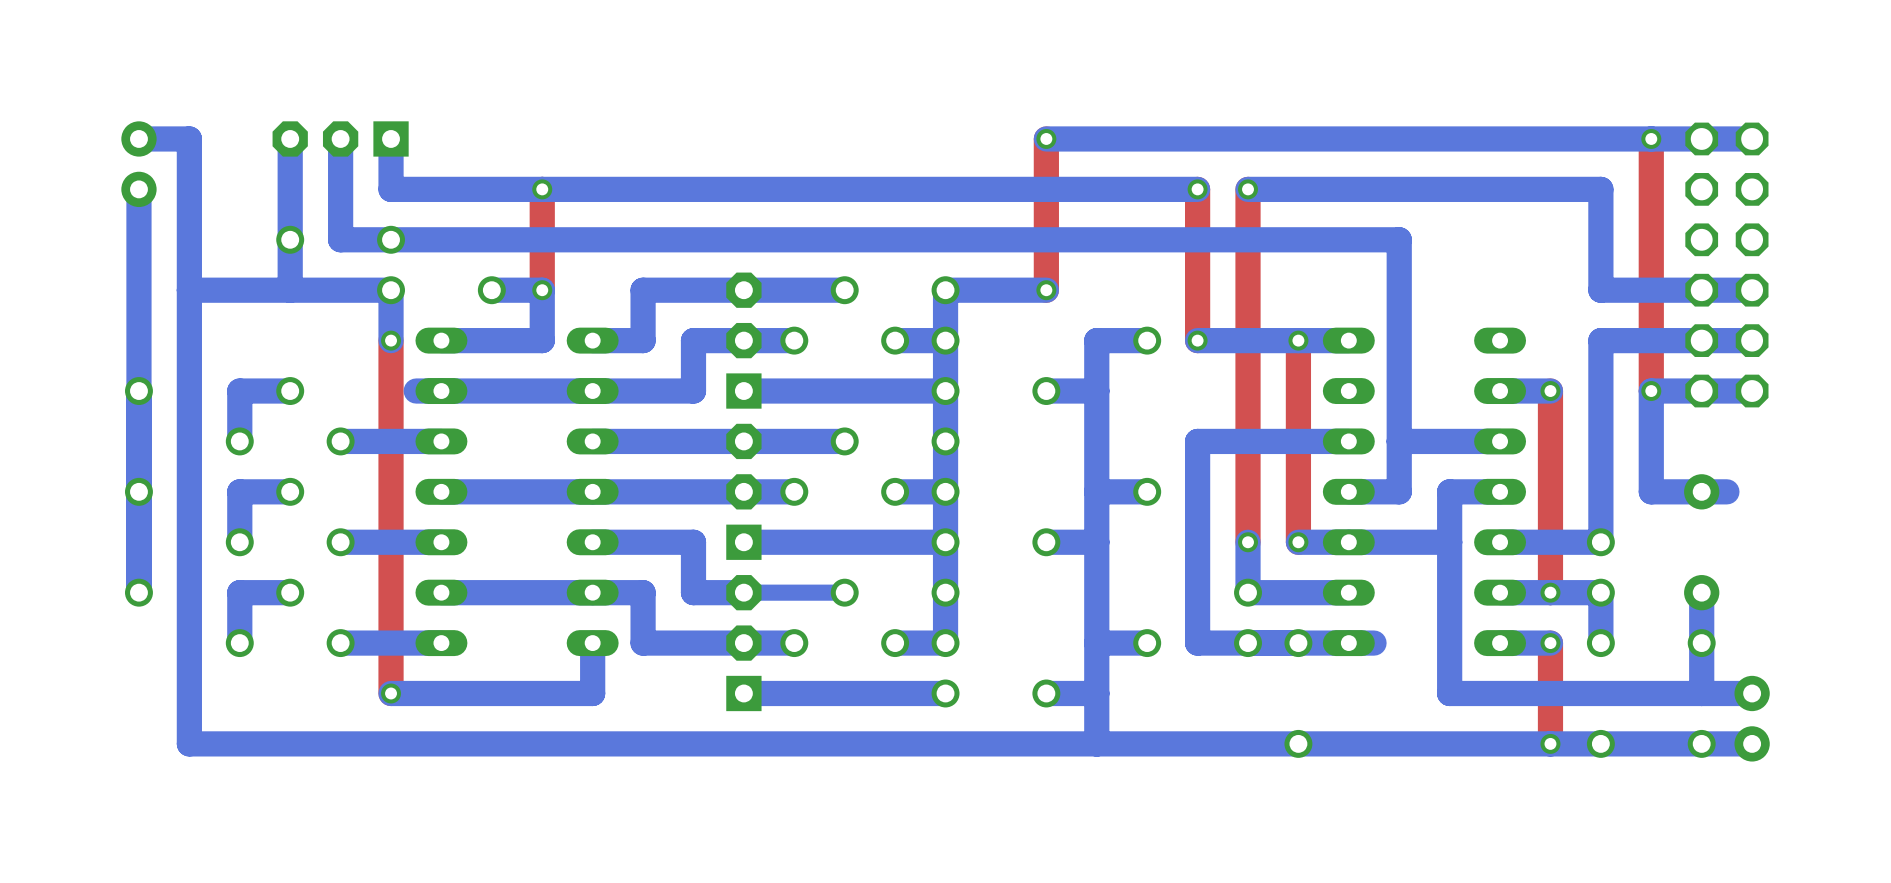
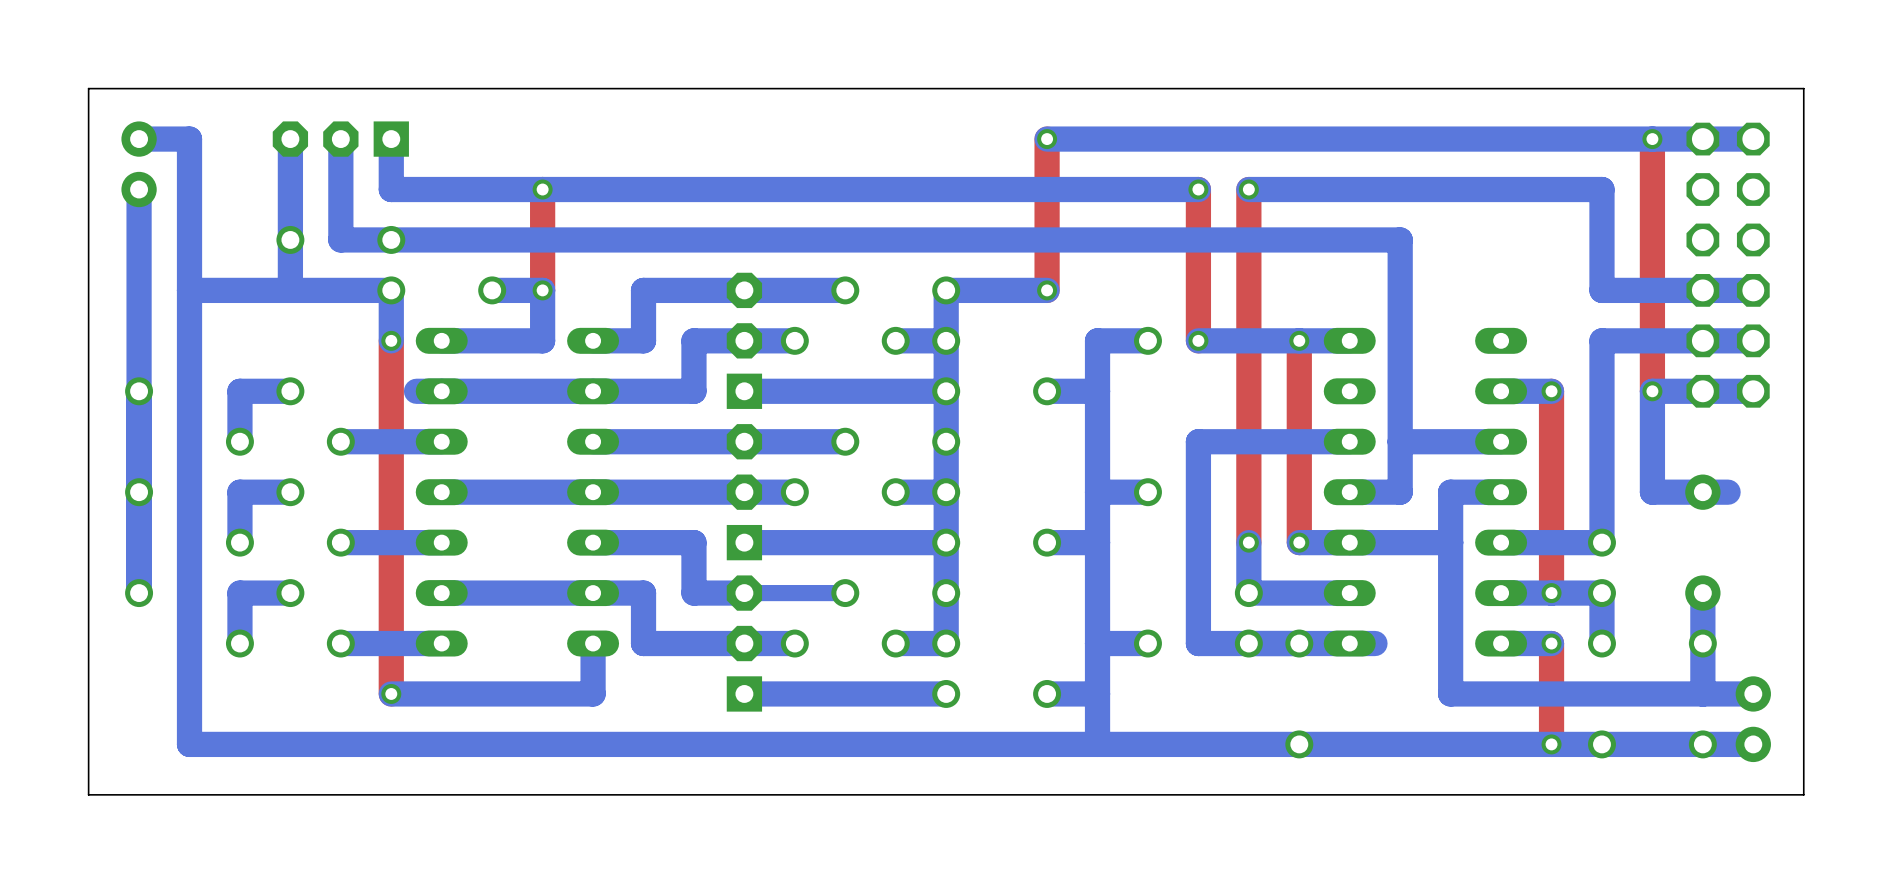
board edge: none -> (1803, 88) (88, 88) (88, 794) (1803, 794) (1803, 88)

